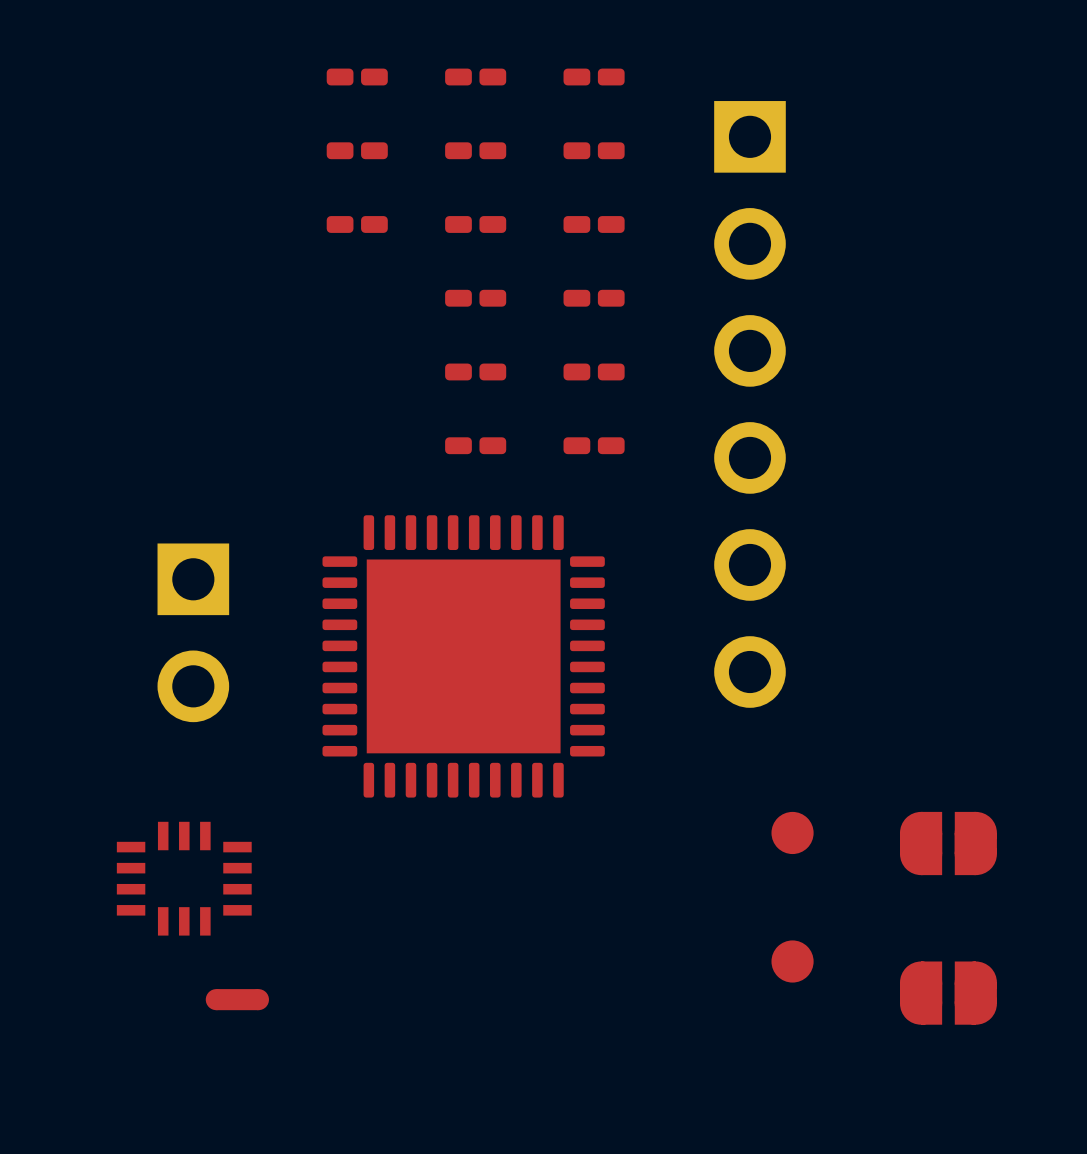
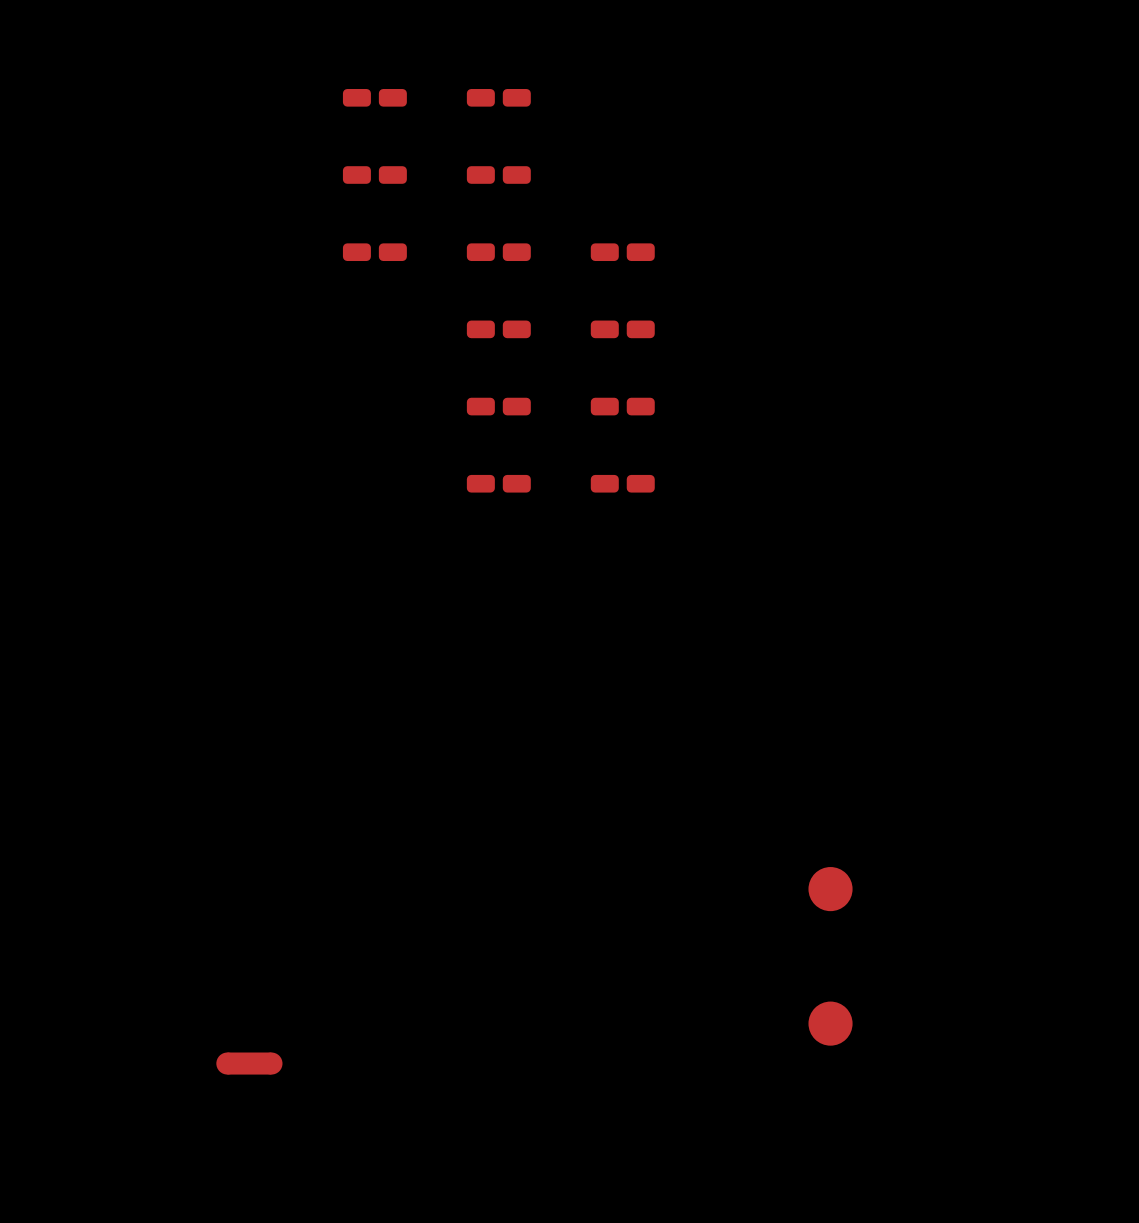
part: (594, 77) -> none
part: (594, 150) -> none
part: (749, 404) -> none
part: (193, 632) -> none
part: (463, 656) -> none
part: (948, 843) -> none
part: (184, 878) -> none
part: (948, 993) -> none

